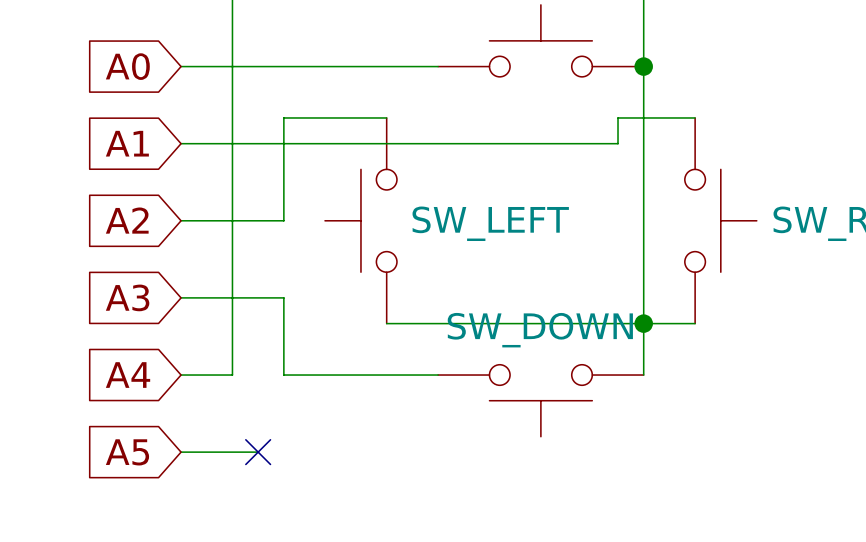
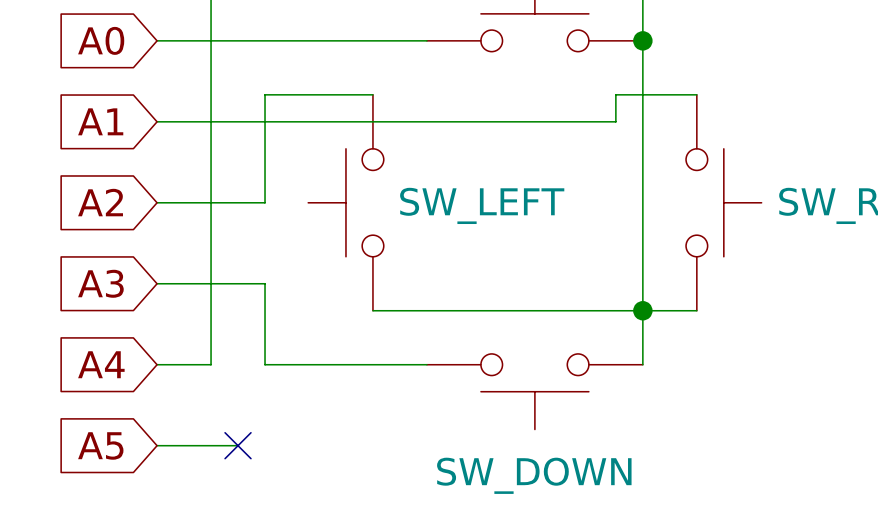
part value position: SW_DOWN (540, 330) -> SW_DOWN (534, 475)

